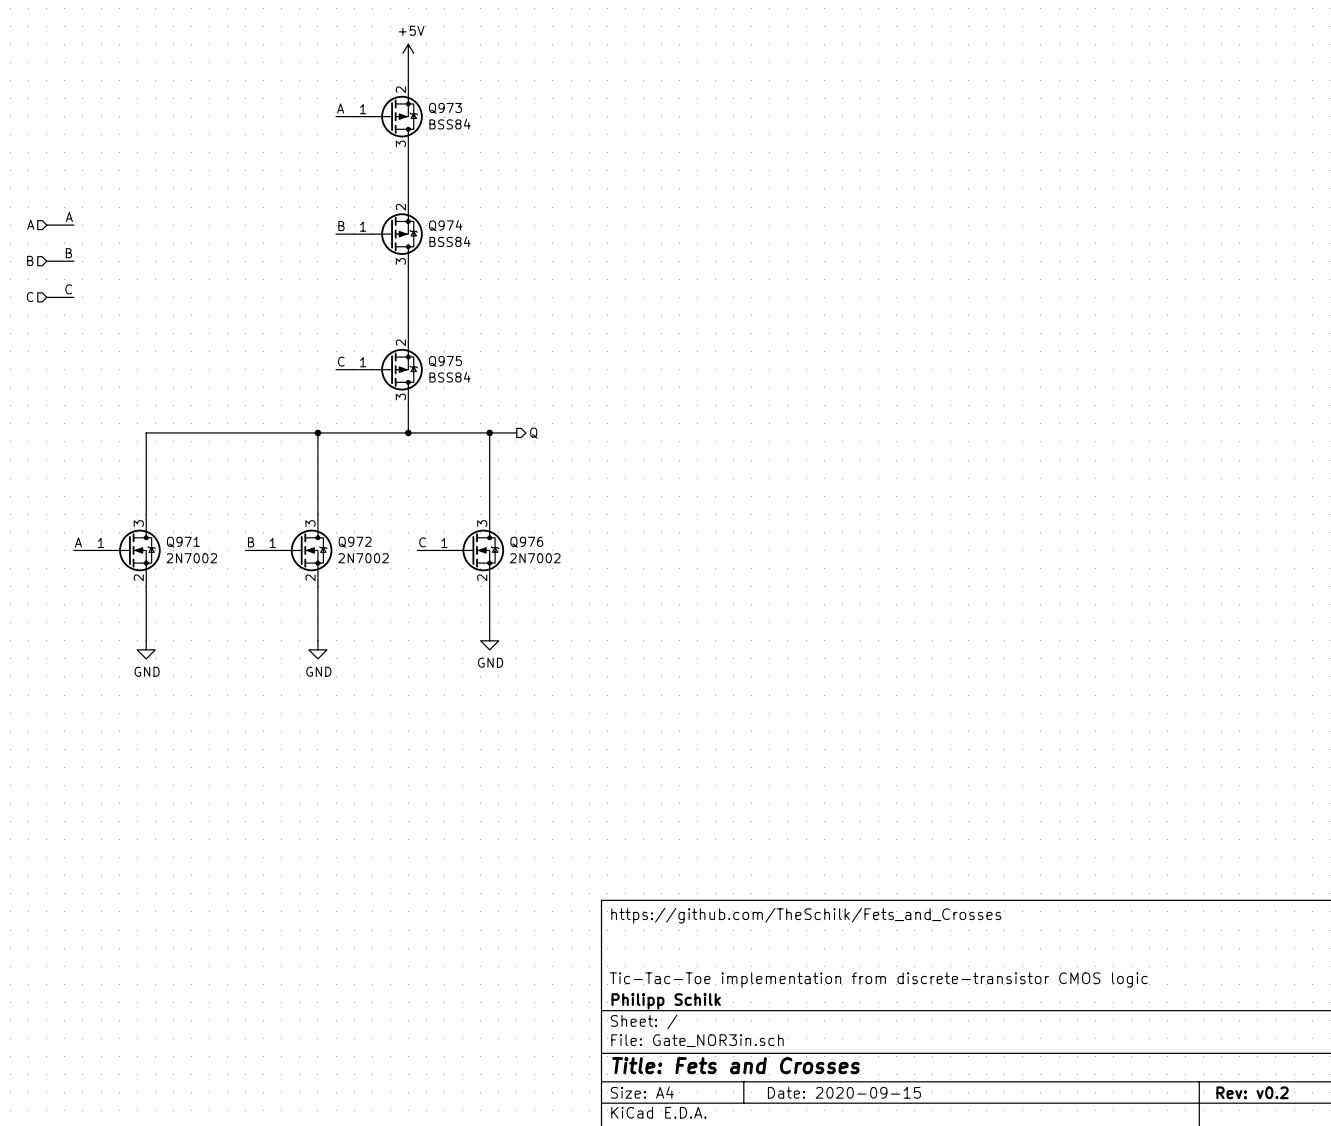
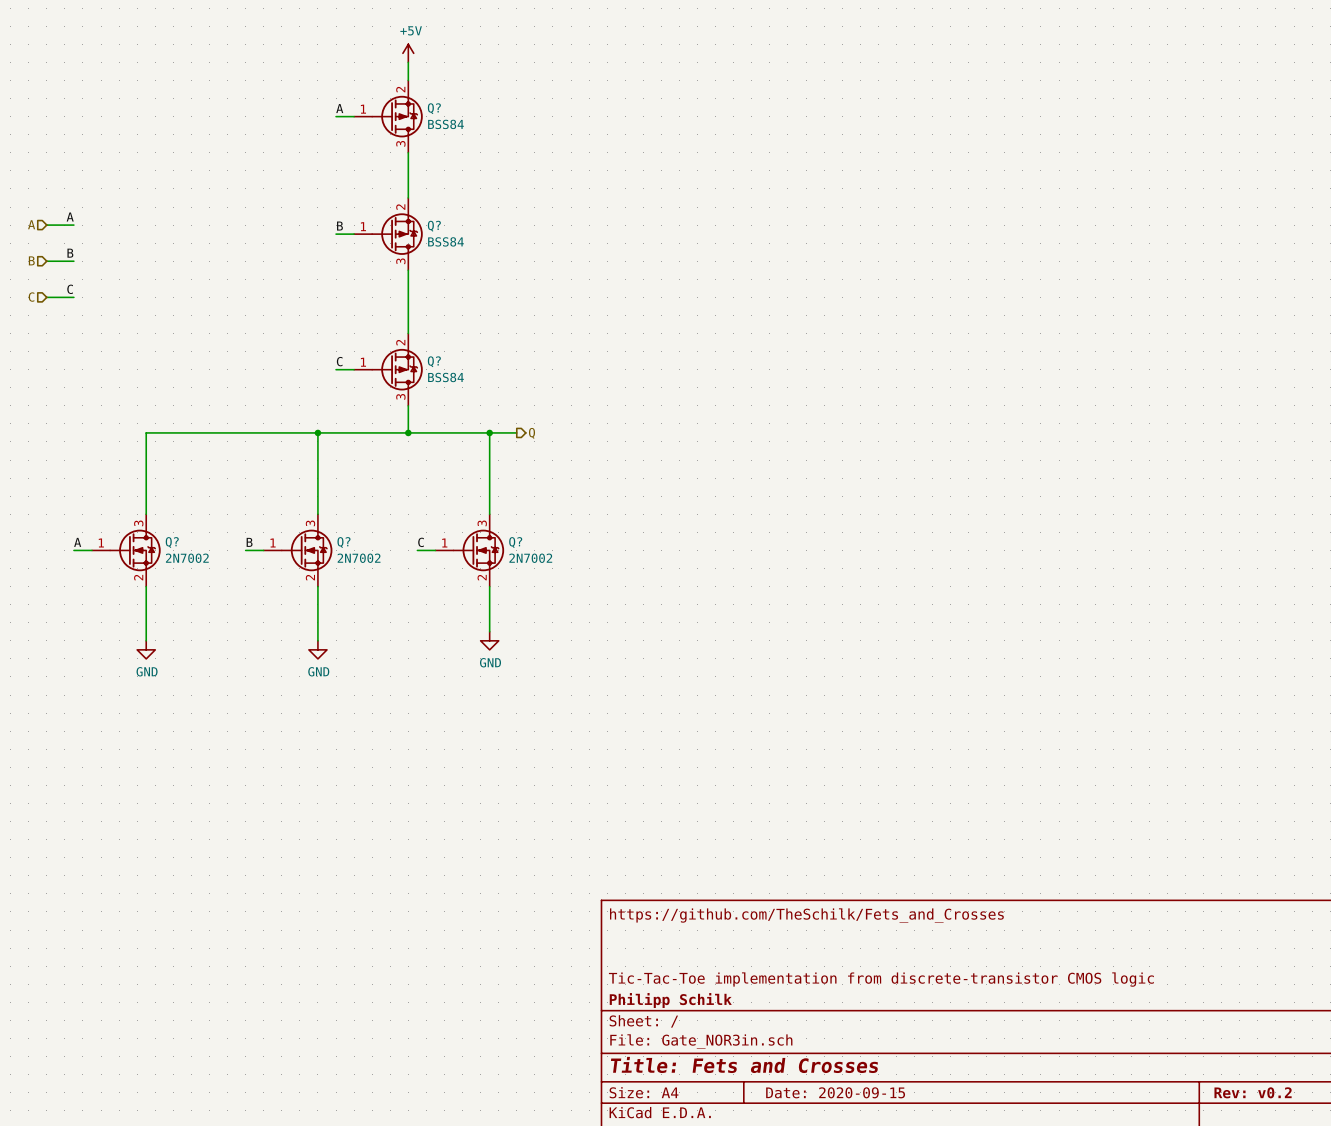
Q973 name: Q973 (445, 108) -> Q? (434, 108)
Q974 name: Q974 (445, 225) -> Q? (434, 226)
Q975 name: Q975 (445, 361) -> Q? (434, 361)
Q971 name: Q971 (183, 542) -> Q? (172, 542)
Q972 name: Q972 (355, 542) -> Q? (343, 542)
Q976 name: Q976 (526, 542) -> Q? (515, 542)

